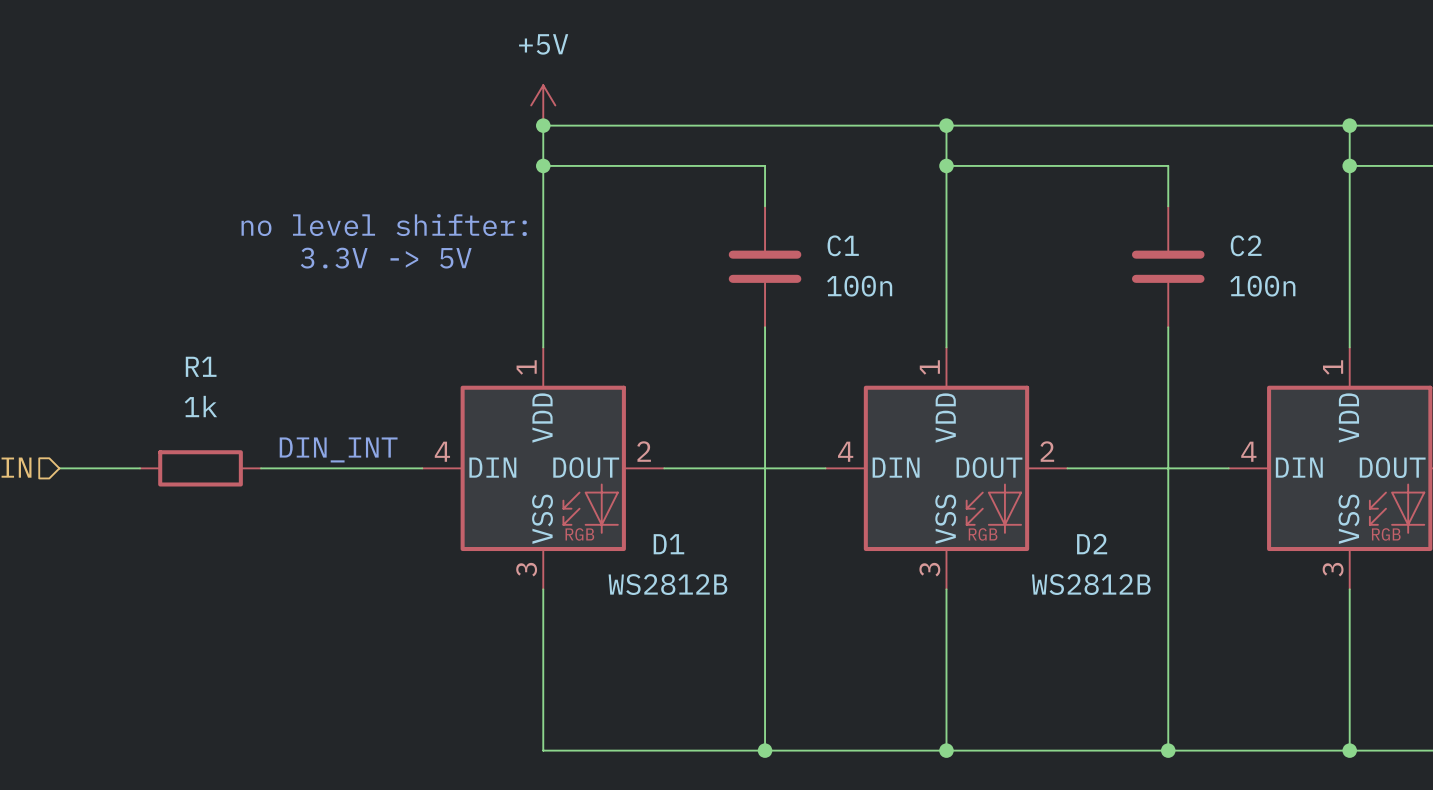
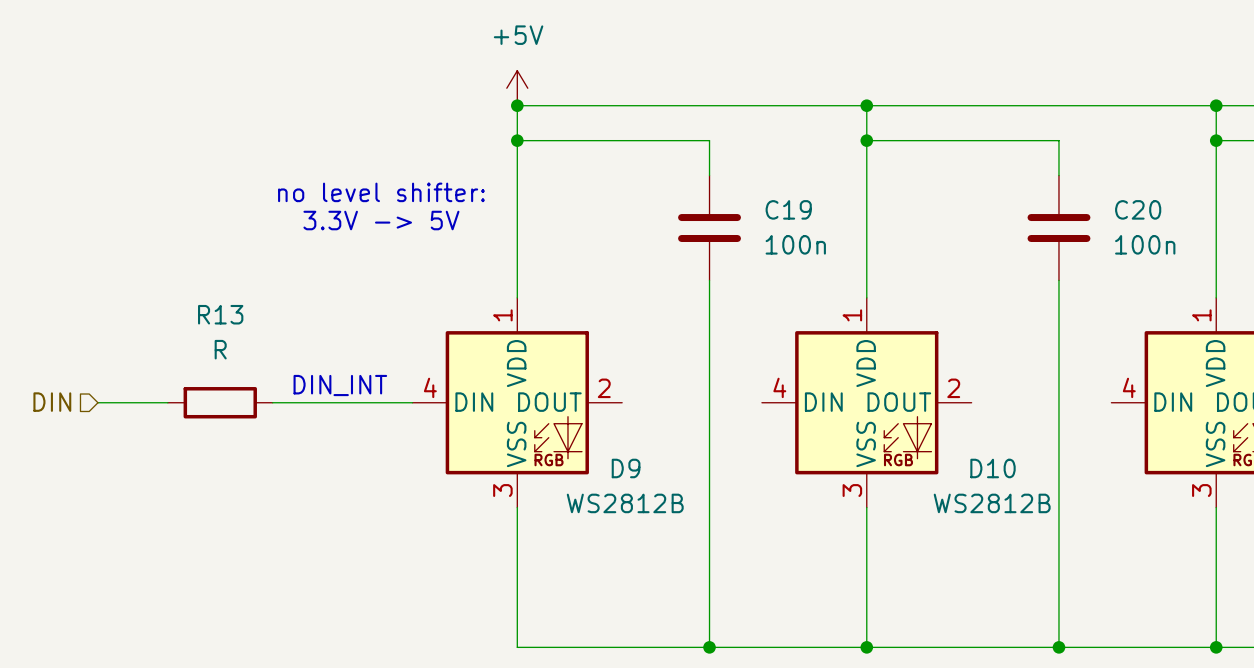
C1 name: C1 (843, 245) -> C19 (788, 209)
C2 name: C2 (1246, 245) -> C20 (1138, 209)
R1 name: R1 (201, 366) -> R13 (220, 314)
R1 value: 1k (200, 406) -> R (220, 349)
wire: (664, 468) (825, 468) -> none
wire: (1067, 468) (1228, 468) -> none
D1 name: D1 (668, 544) -> D9 (626, 468)
D2 name: D2 (1092, 544) -> D10 (993, 468)

